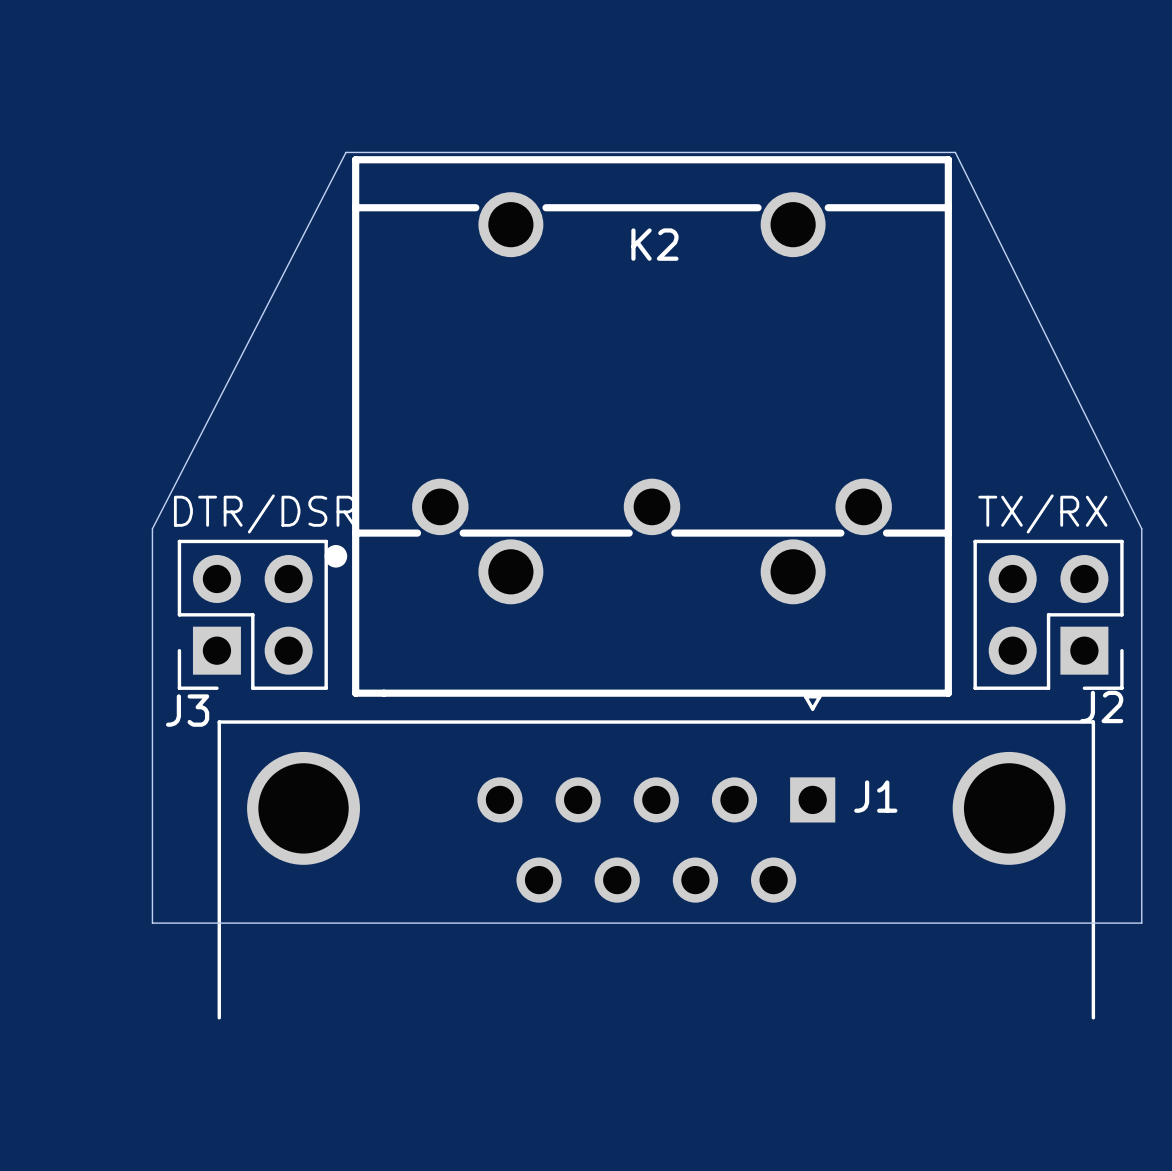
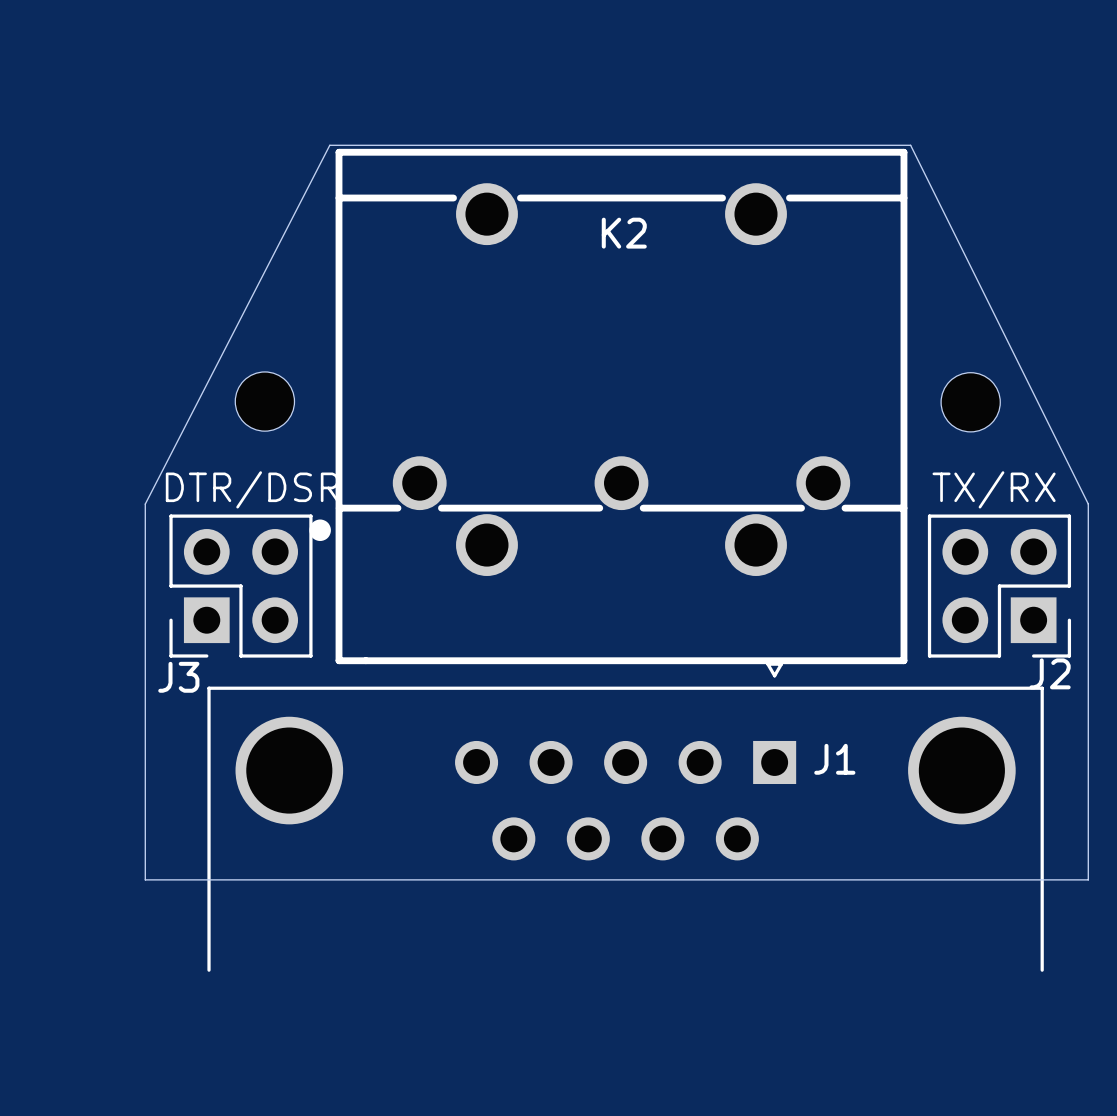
part: none -> (264, 401)
part: none -> (970, 402)

